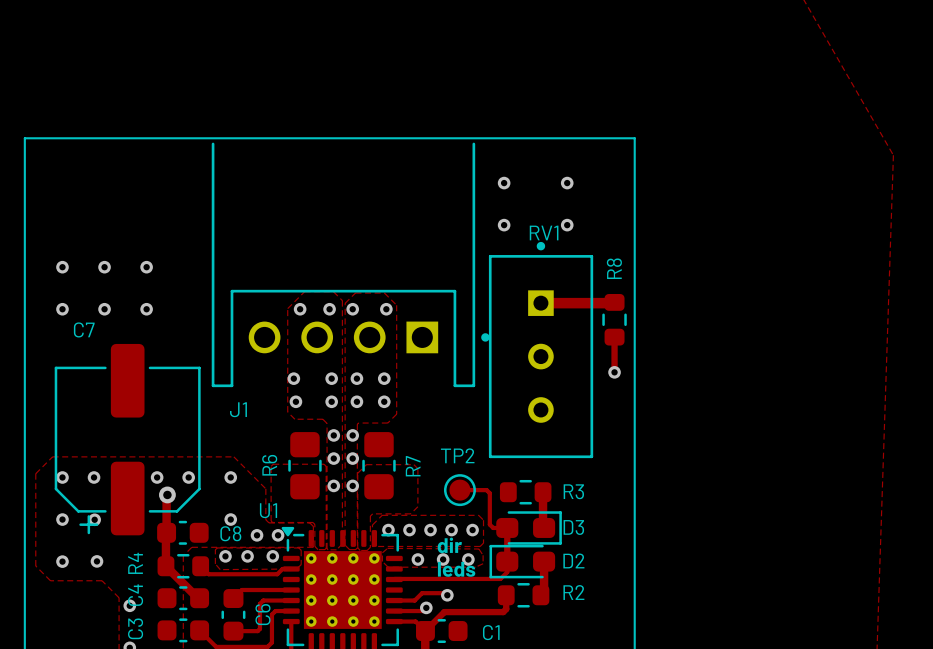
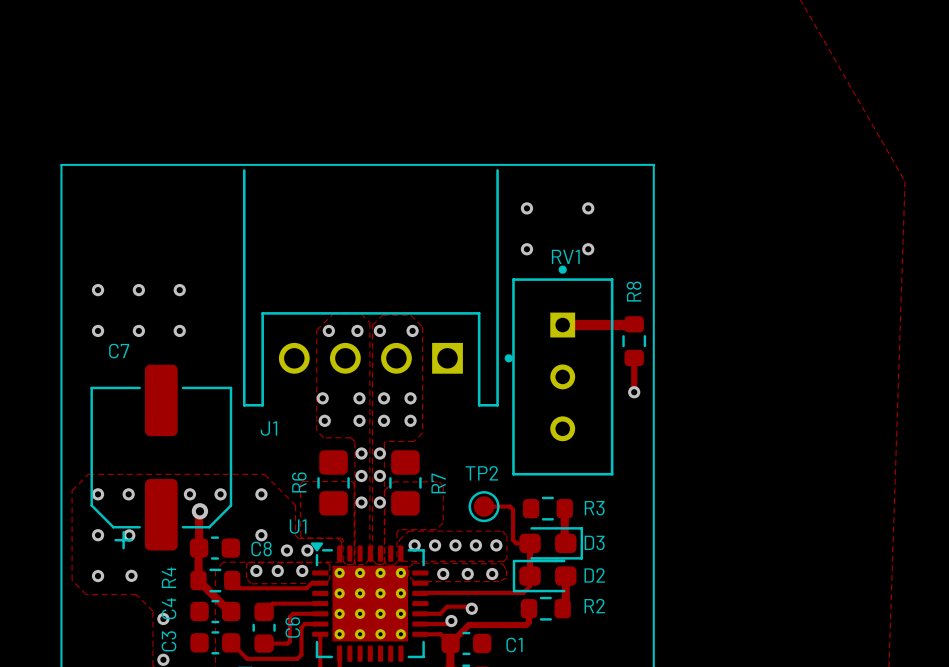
text: dir (449, 545) -> none
text: leds (456, 569) -> none

